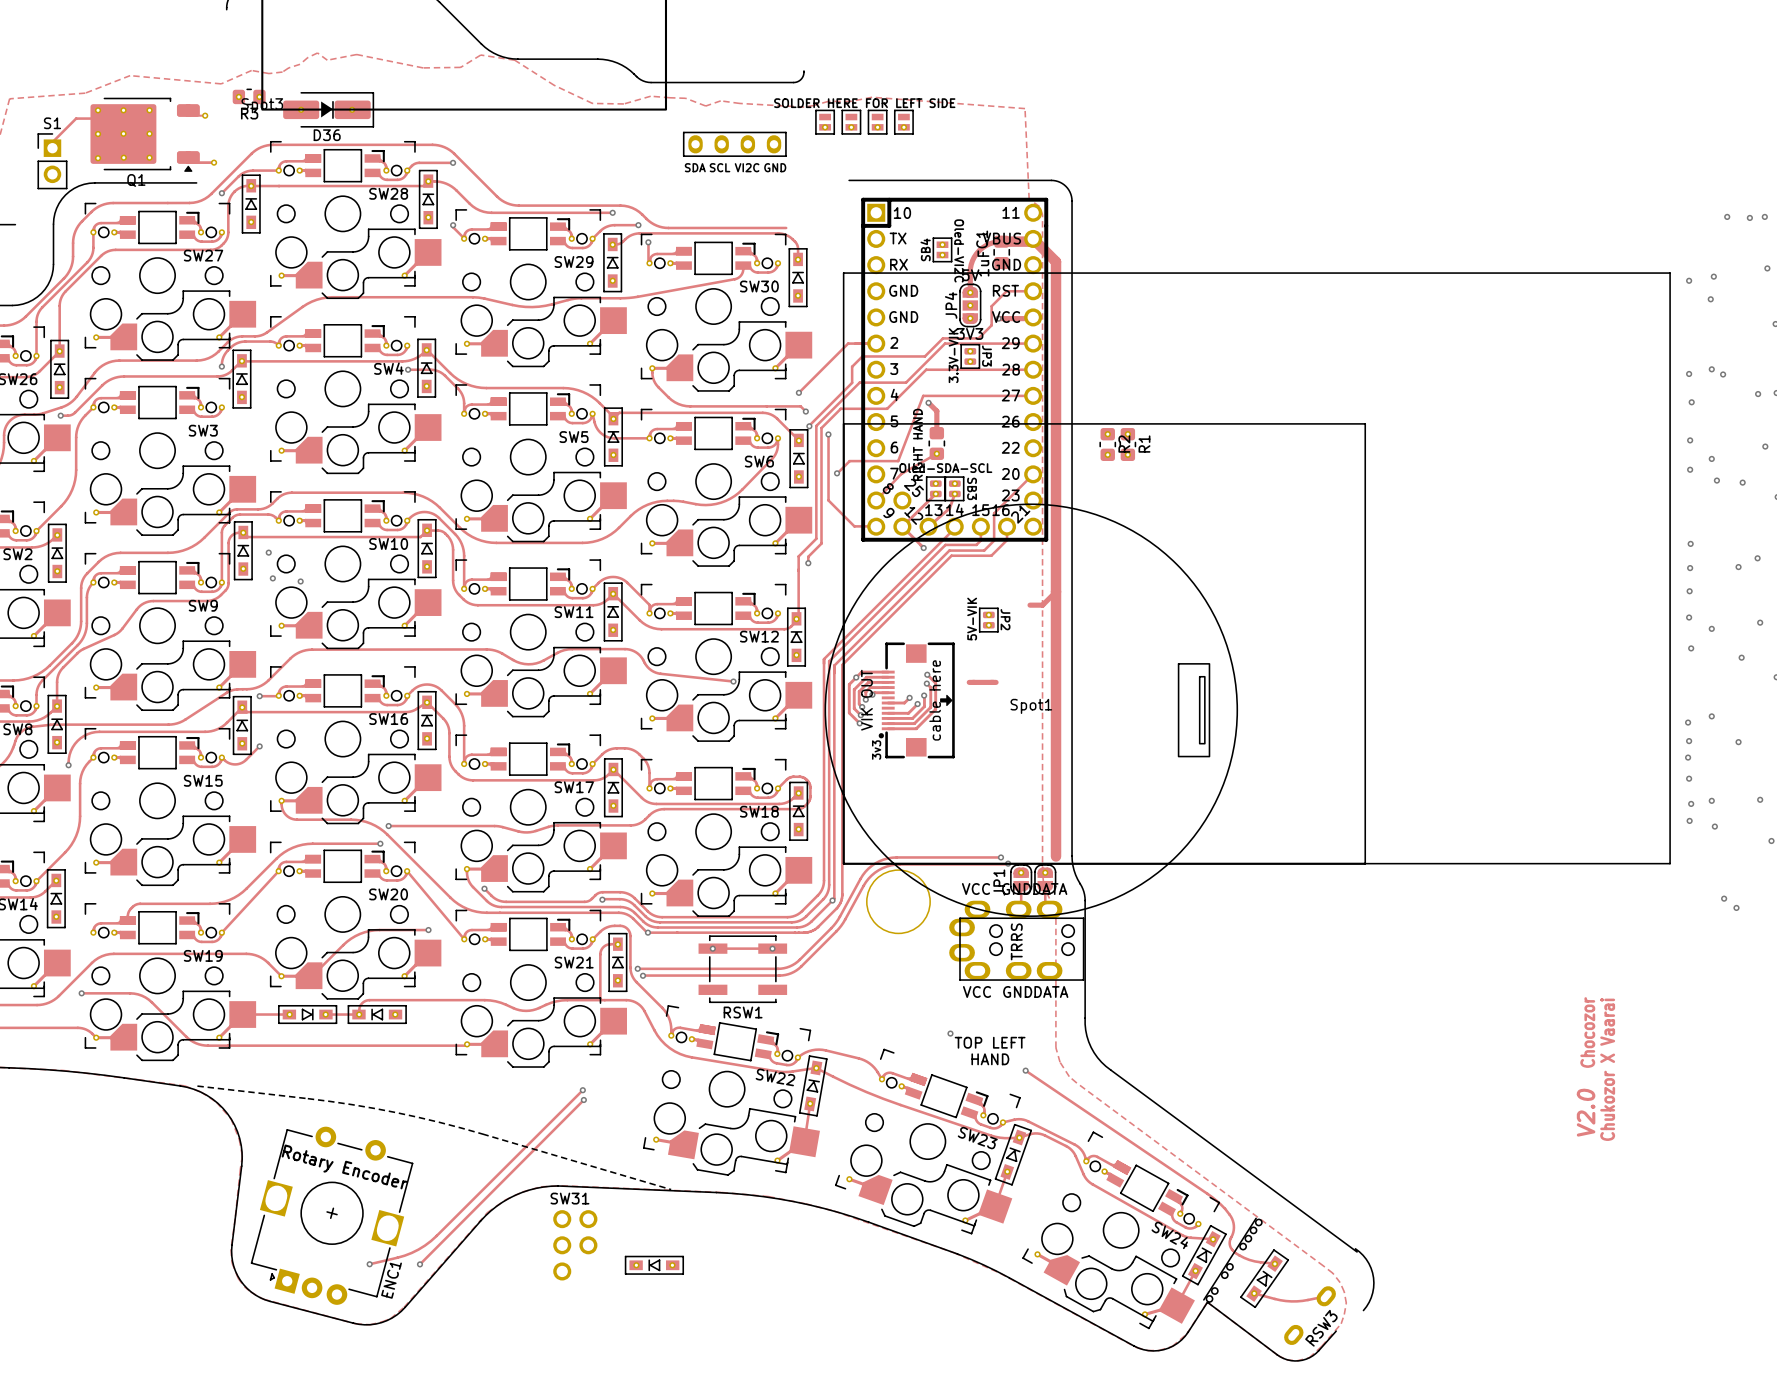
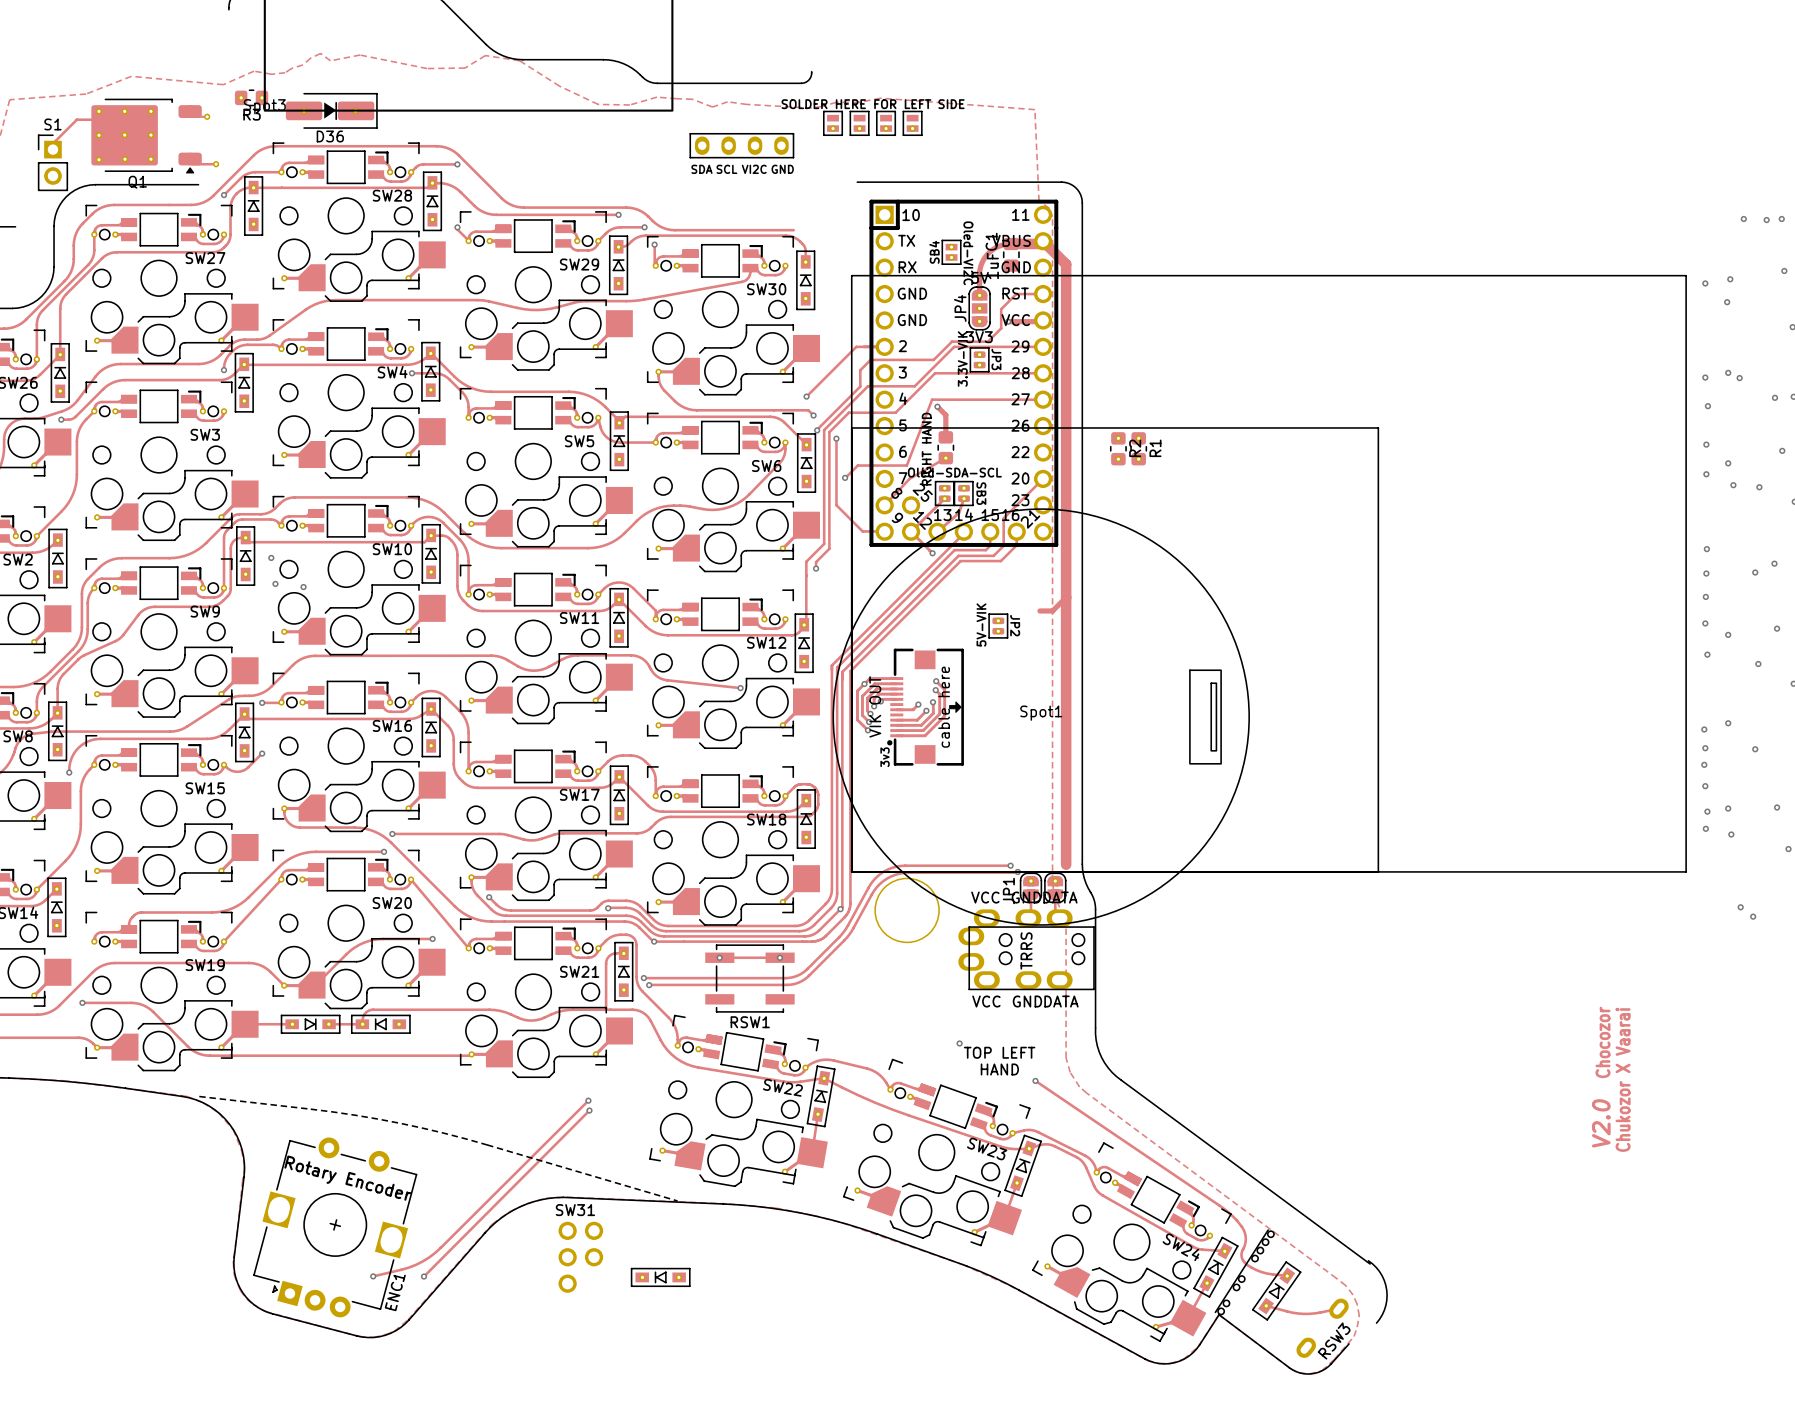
part: (982, 682) -> none

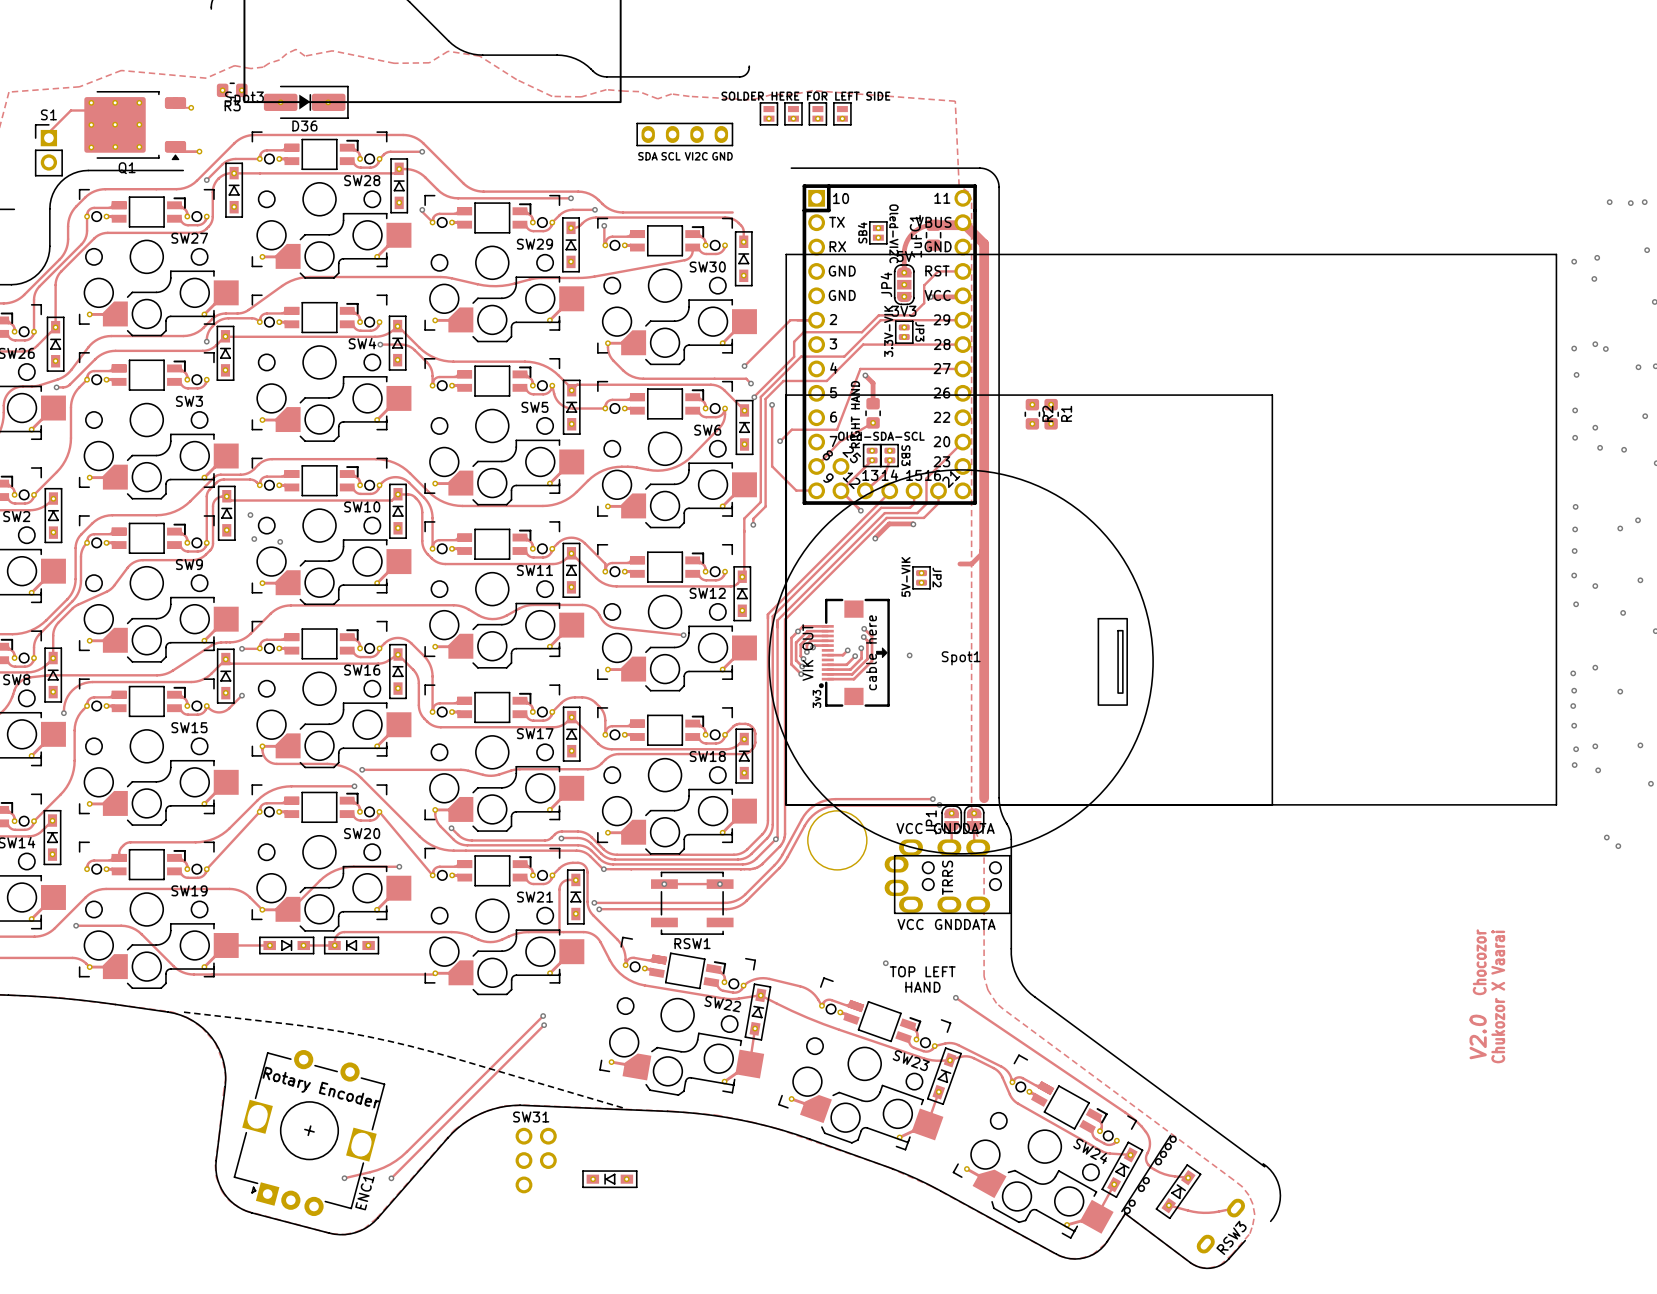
track: none -> (913, 524) (889, 523) (875, 538)
via: none -> (913, 524)
via: none -> (875, 538)
via: none -> (909, 655)

